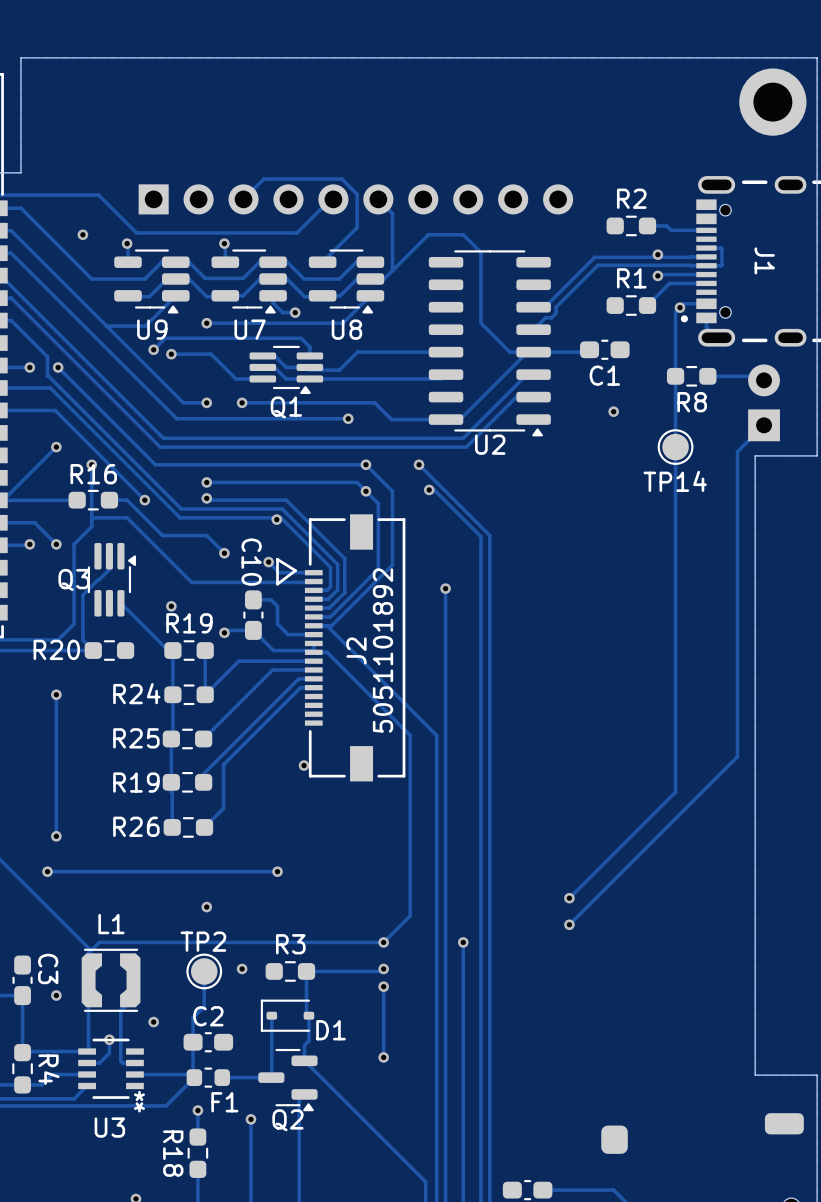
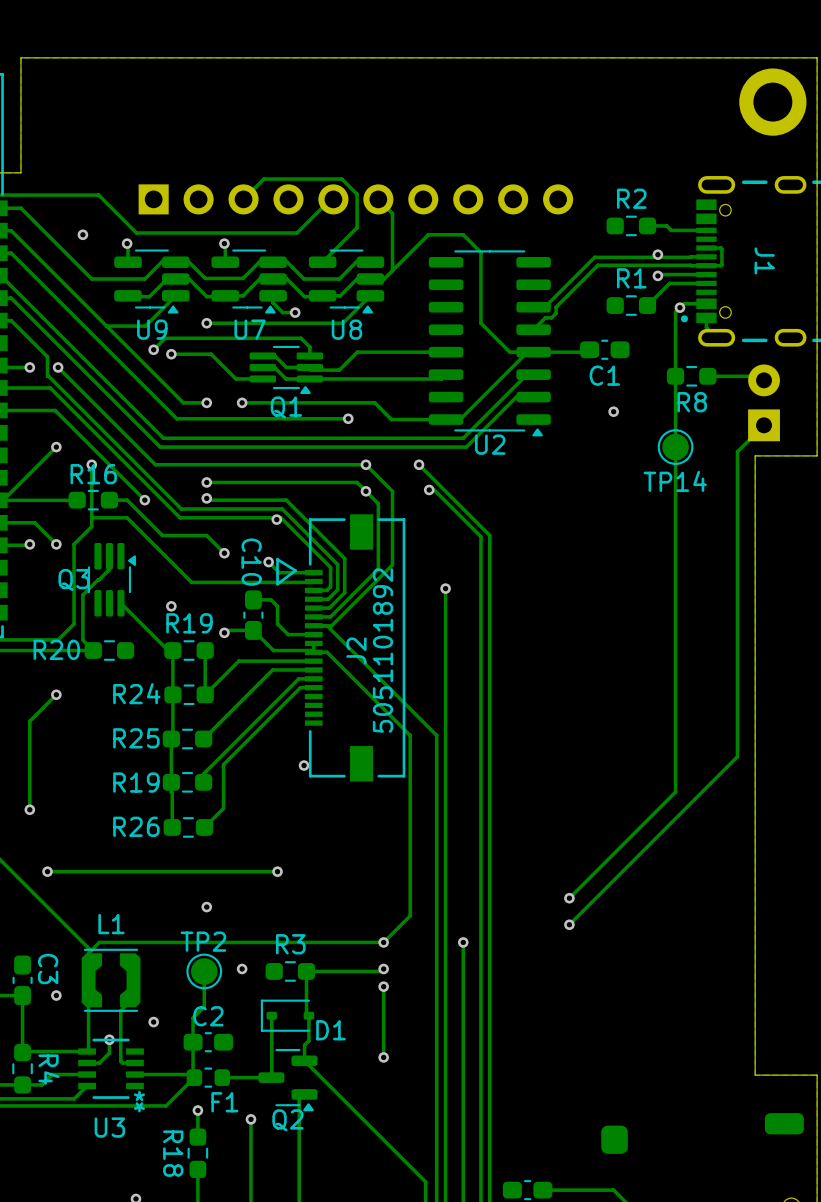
track: (56, 694) (56, 836) -> (56, 694) (29, 721) (29, 809)
via position: (56, 836) -> (29, 809)

